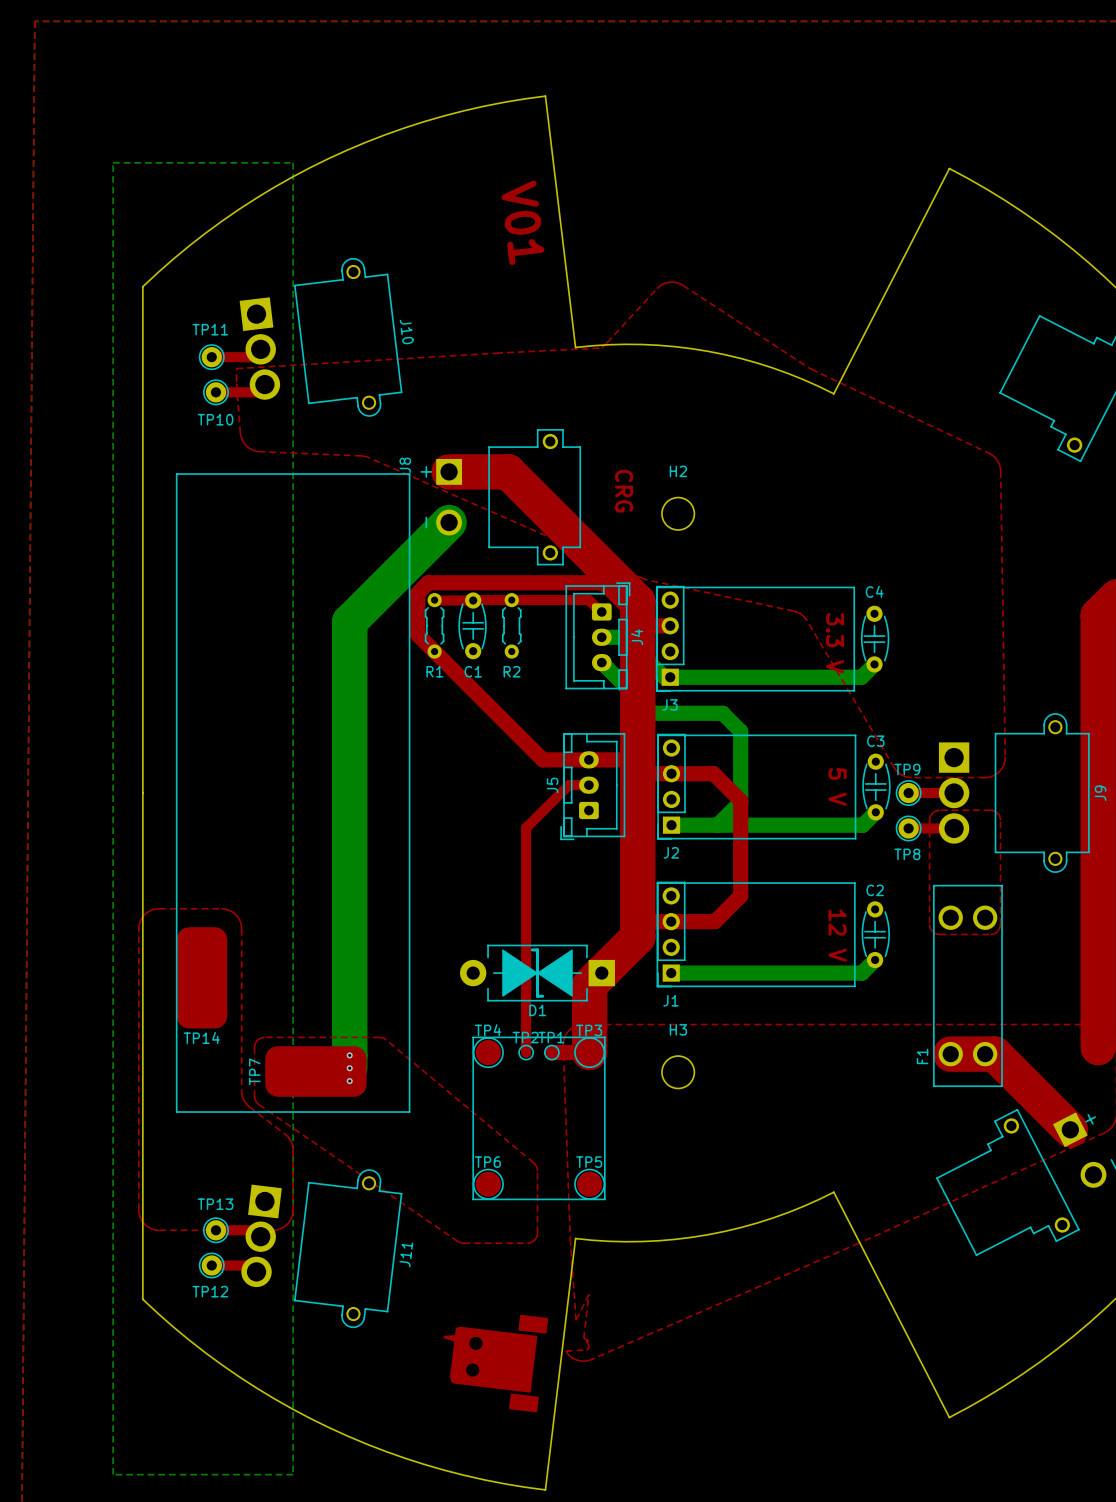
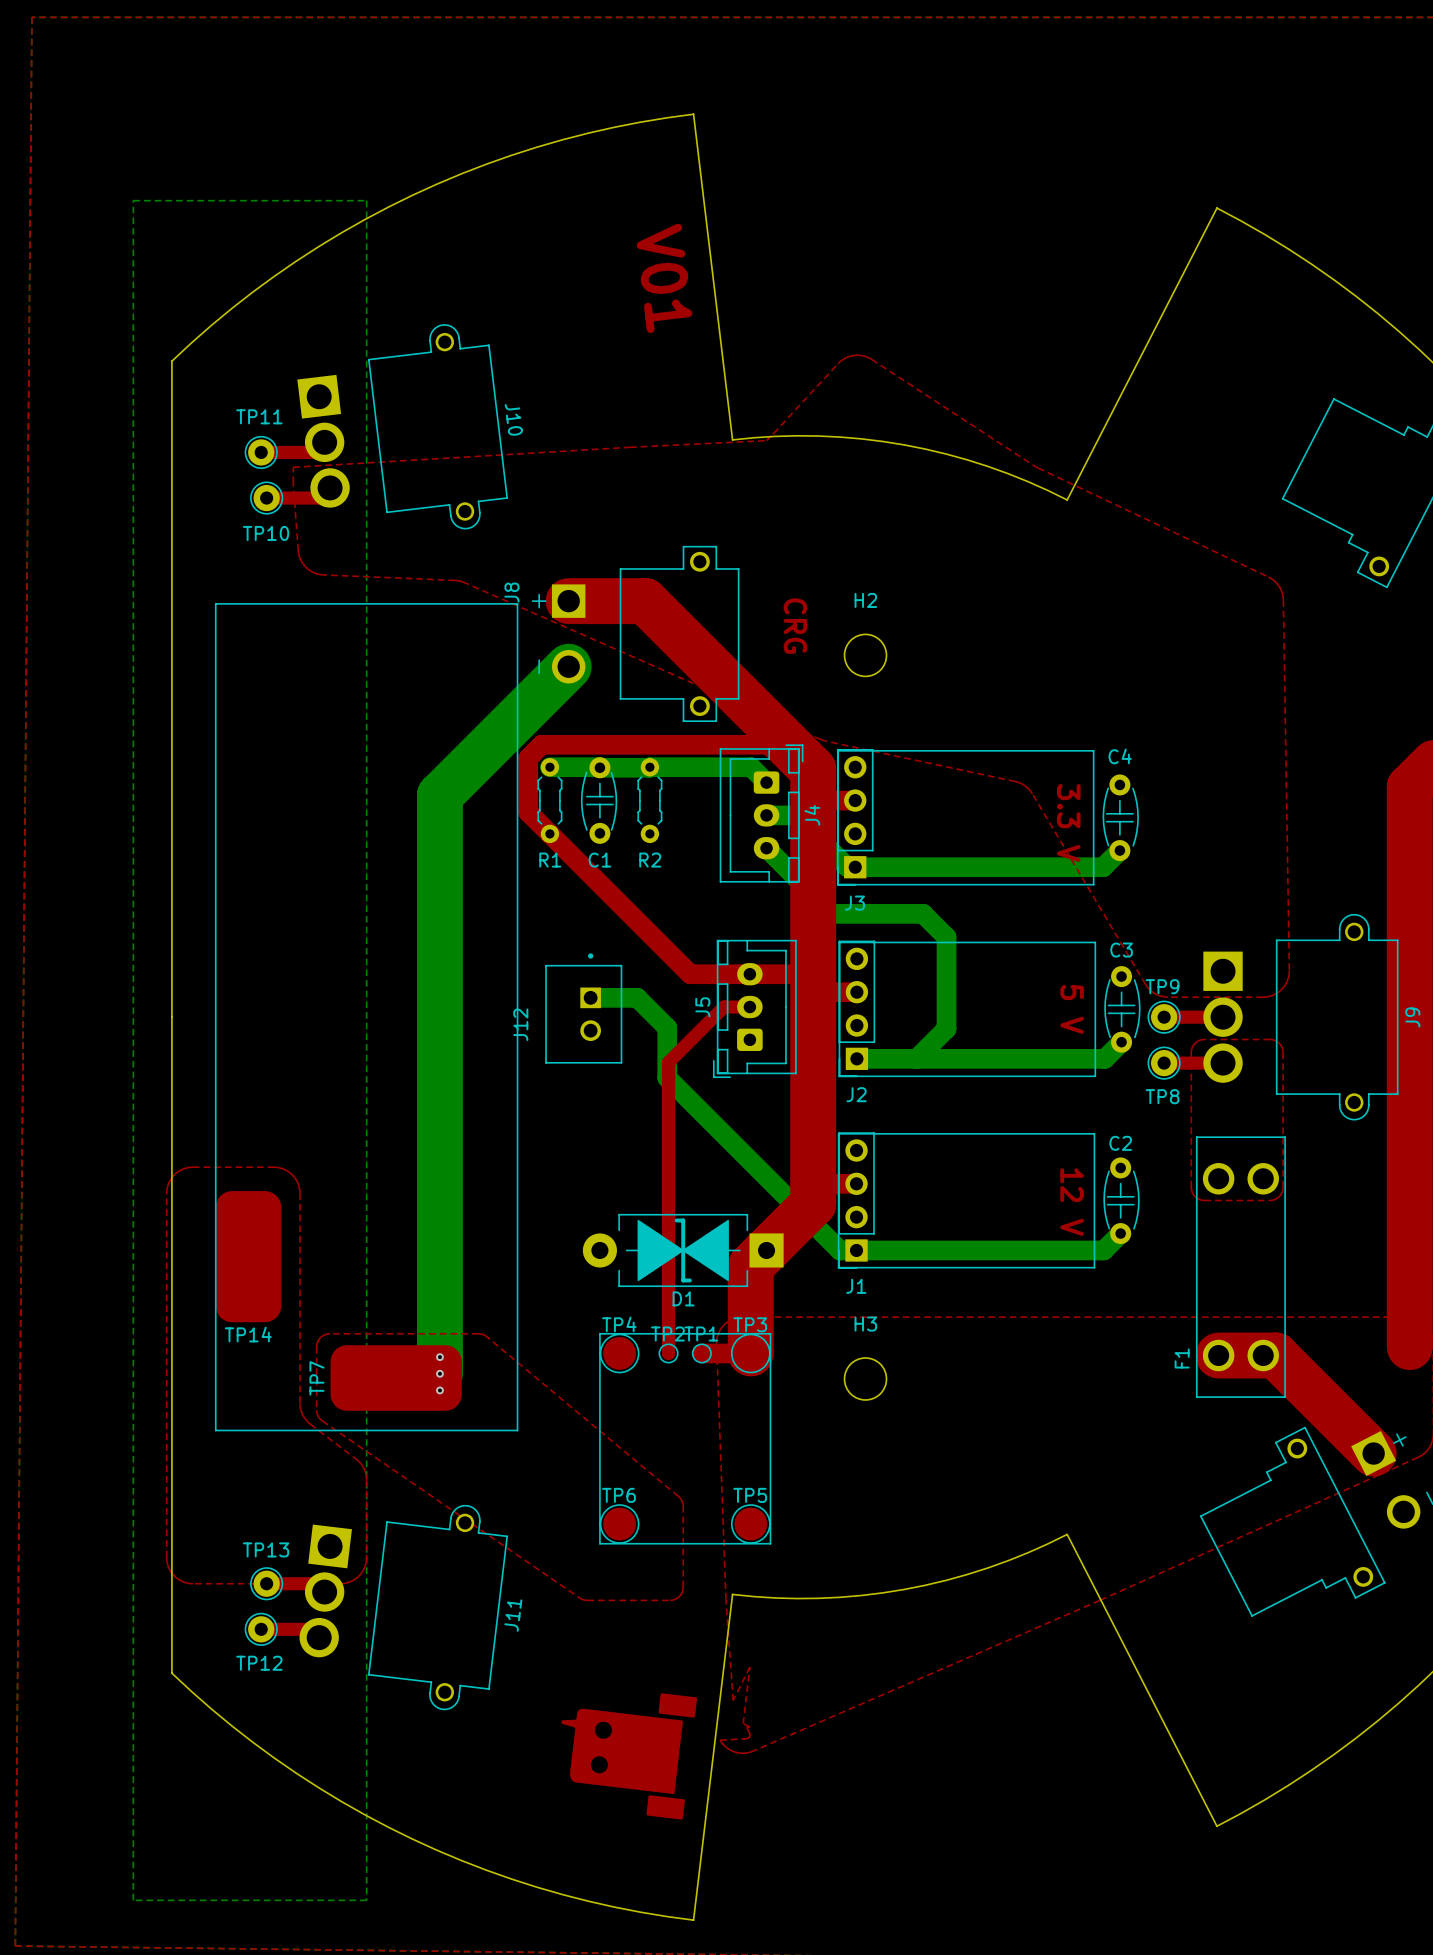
top track: (434, 600) (588, 600) (601, 611) -> none
bottom track: none -> (549, 767) (751, 767) (766, 782)
top track: (671, 773) (713, 773) (740, 800) (740, 895) (714, 921) (671, 921) -> none
bottom track: none -> (590, 997) (637, 997) (667, 1027) (667, 1077) (839, 1250) (856, 1250)
J12: none -> (583, 1008)

